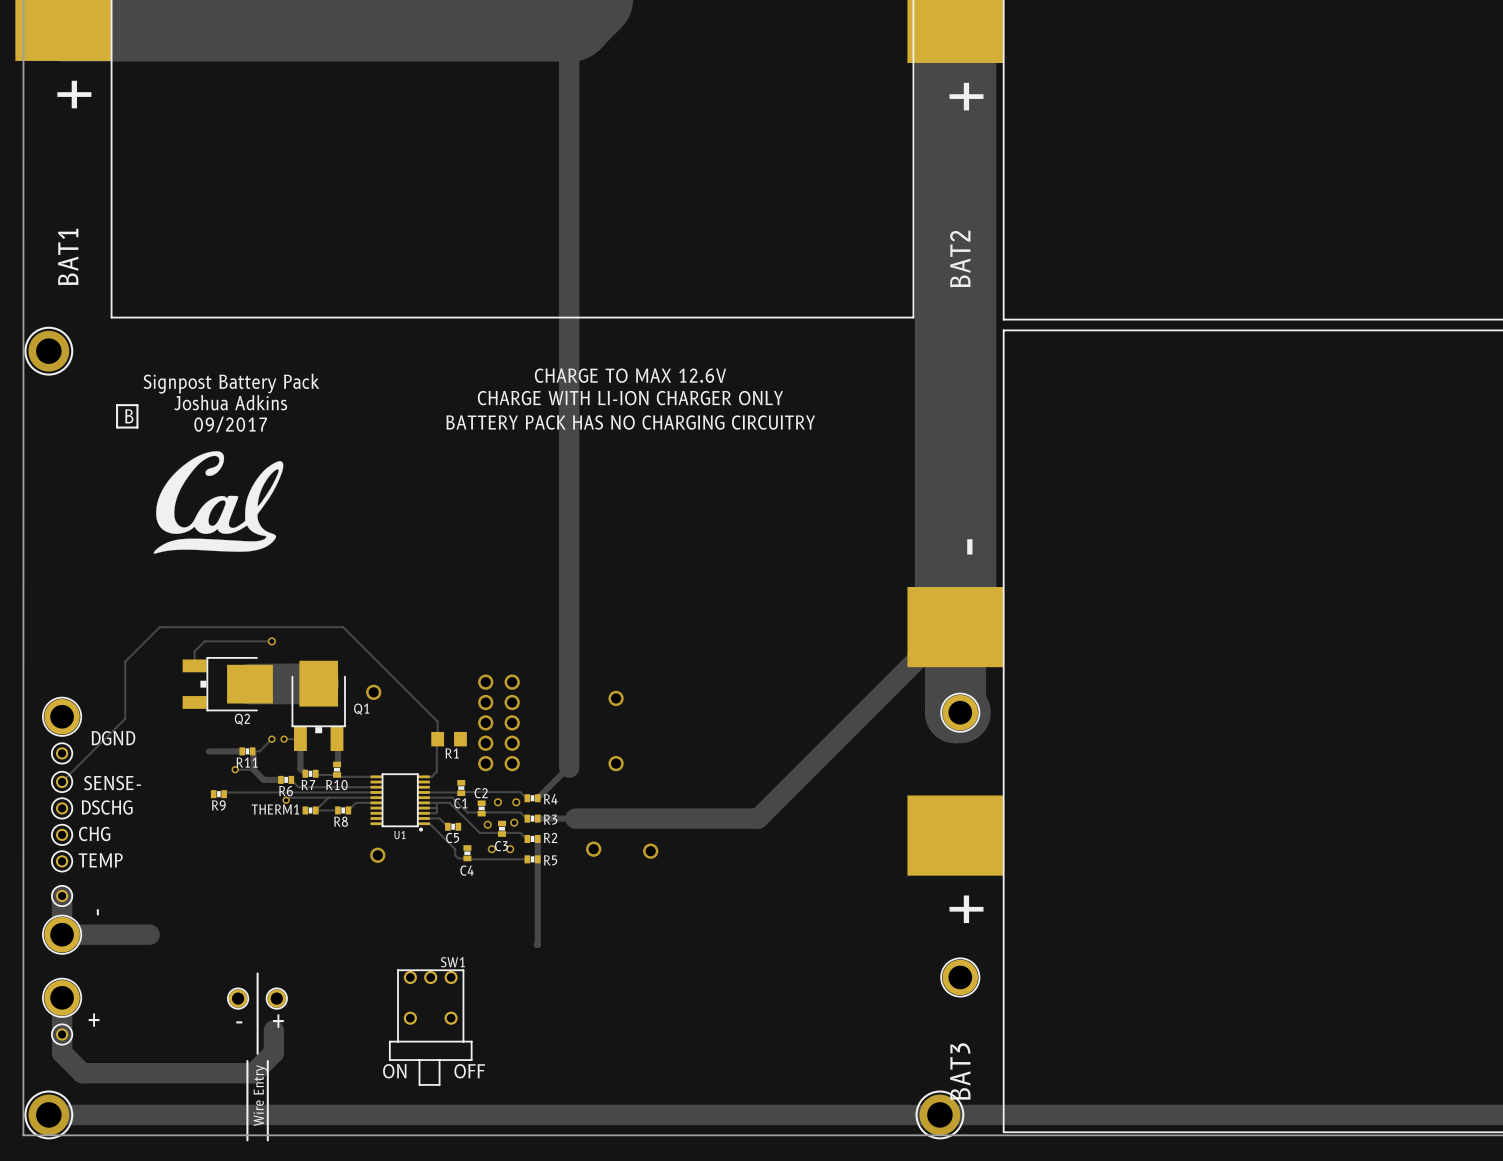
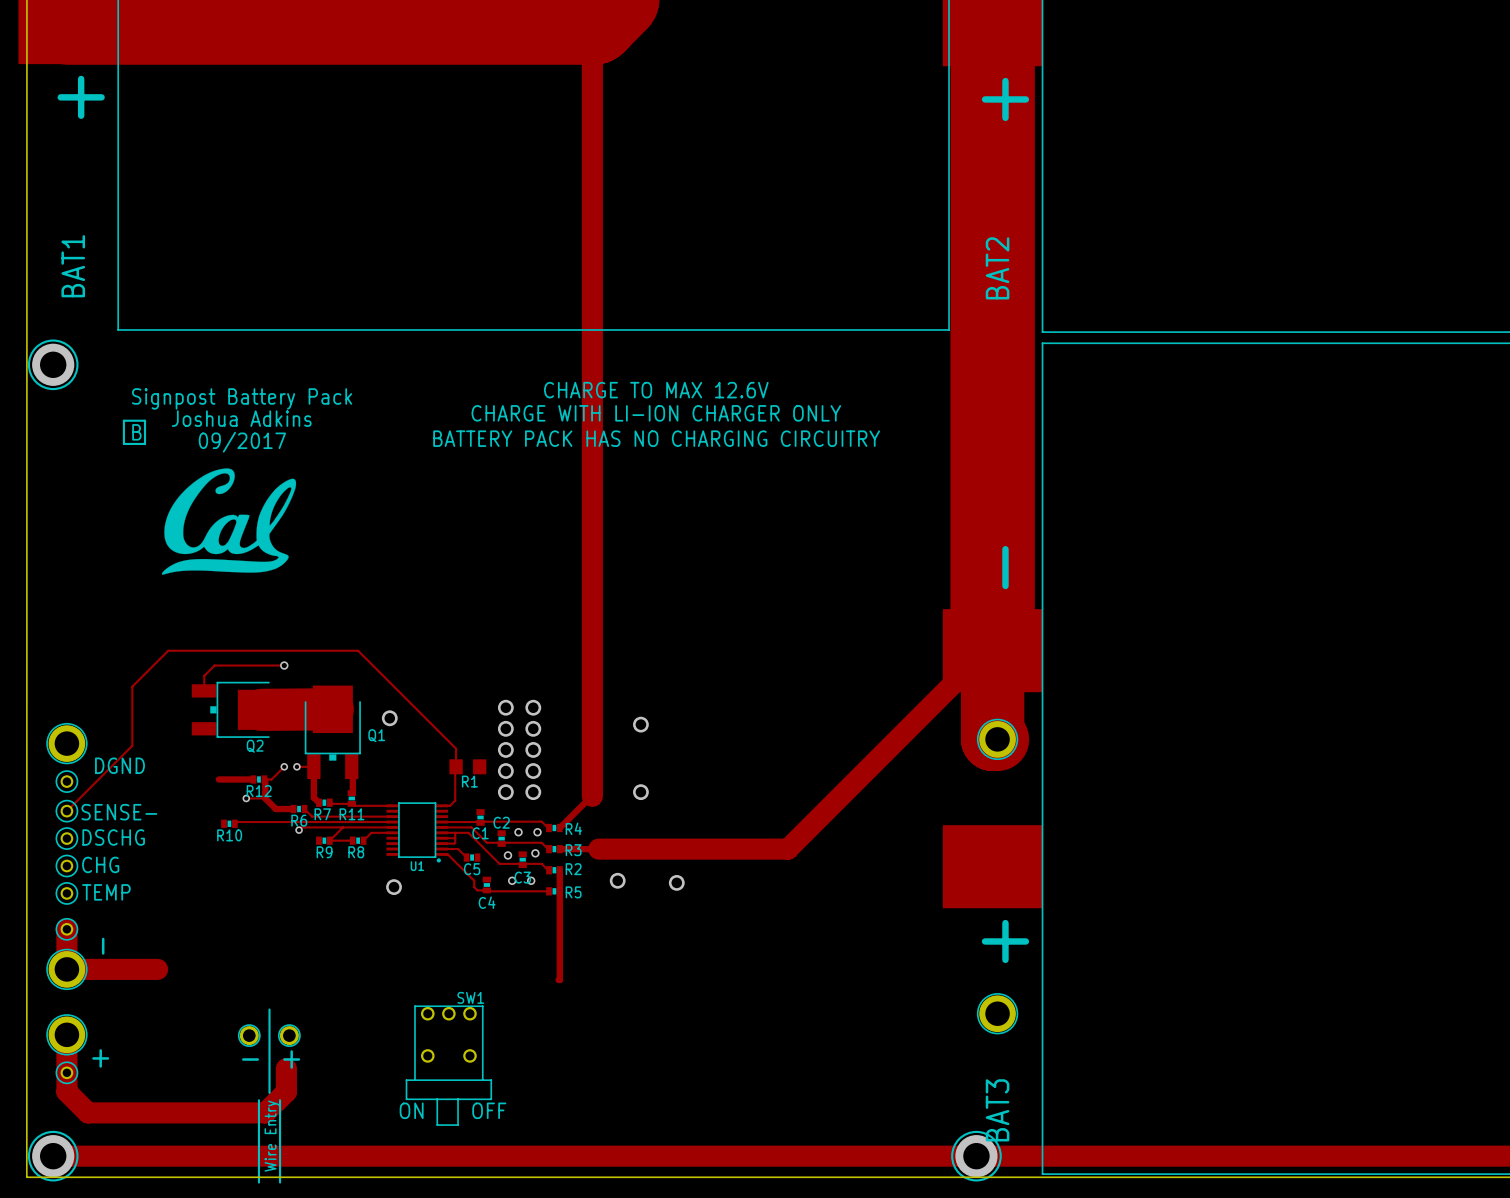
R11 name: R11 (247, 762) -> R12 (259, 791)
R10 name: R10 (336, 785) -> R11 (352, 814)
R9 name: R9 (218, 805) -> R10 (229, 835)
THERM1 name: THERM1 (275, 809) -> R9 (324, 852)

